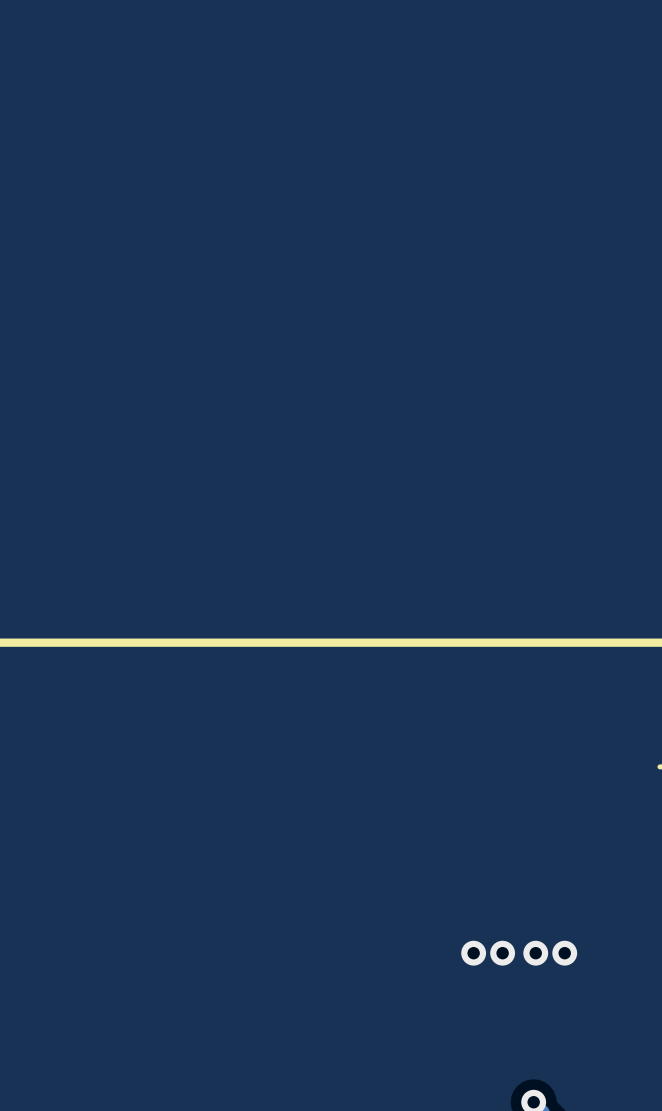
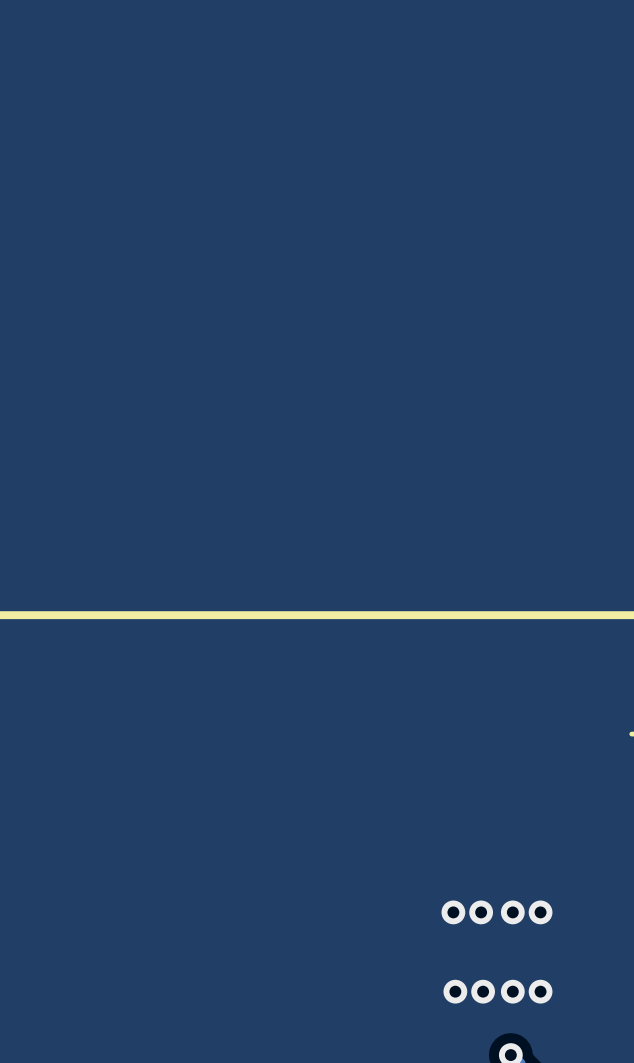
via: none -> (455, 991)
via: none -> (483, 991)
via: none -> (512, 991)
via: none -> (540, 991)

